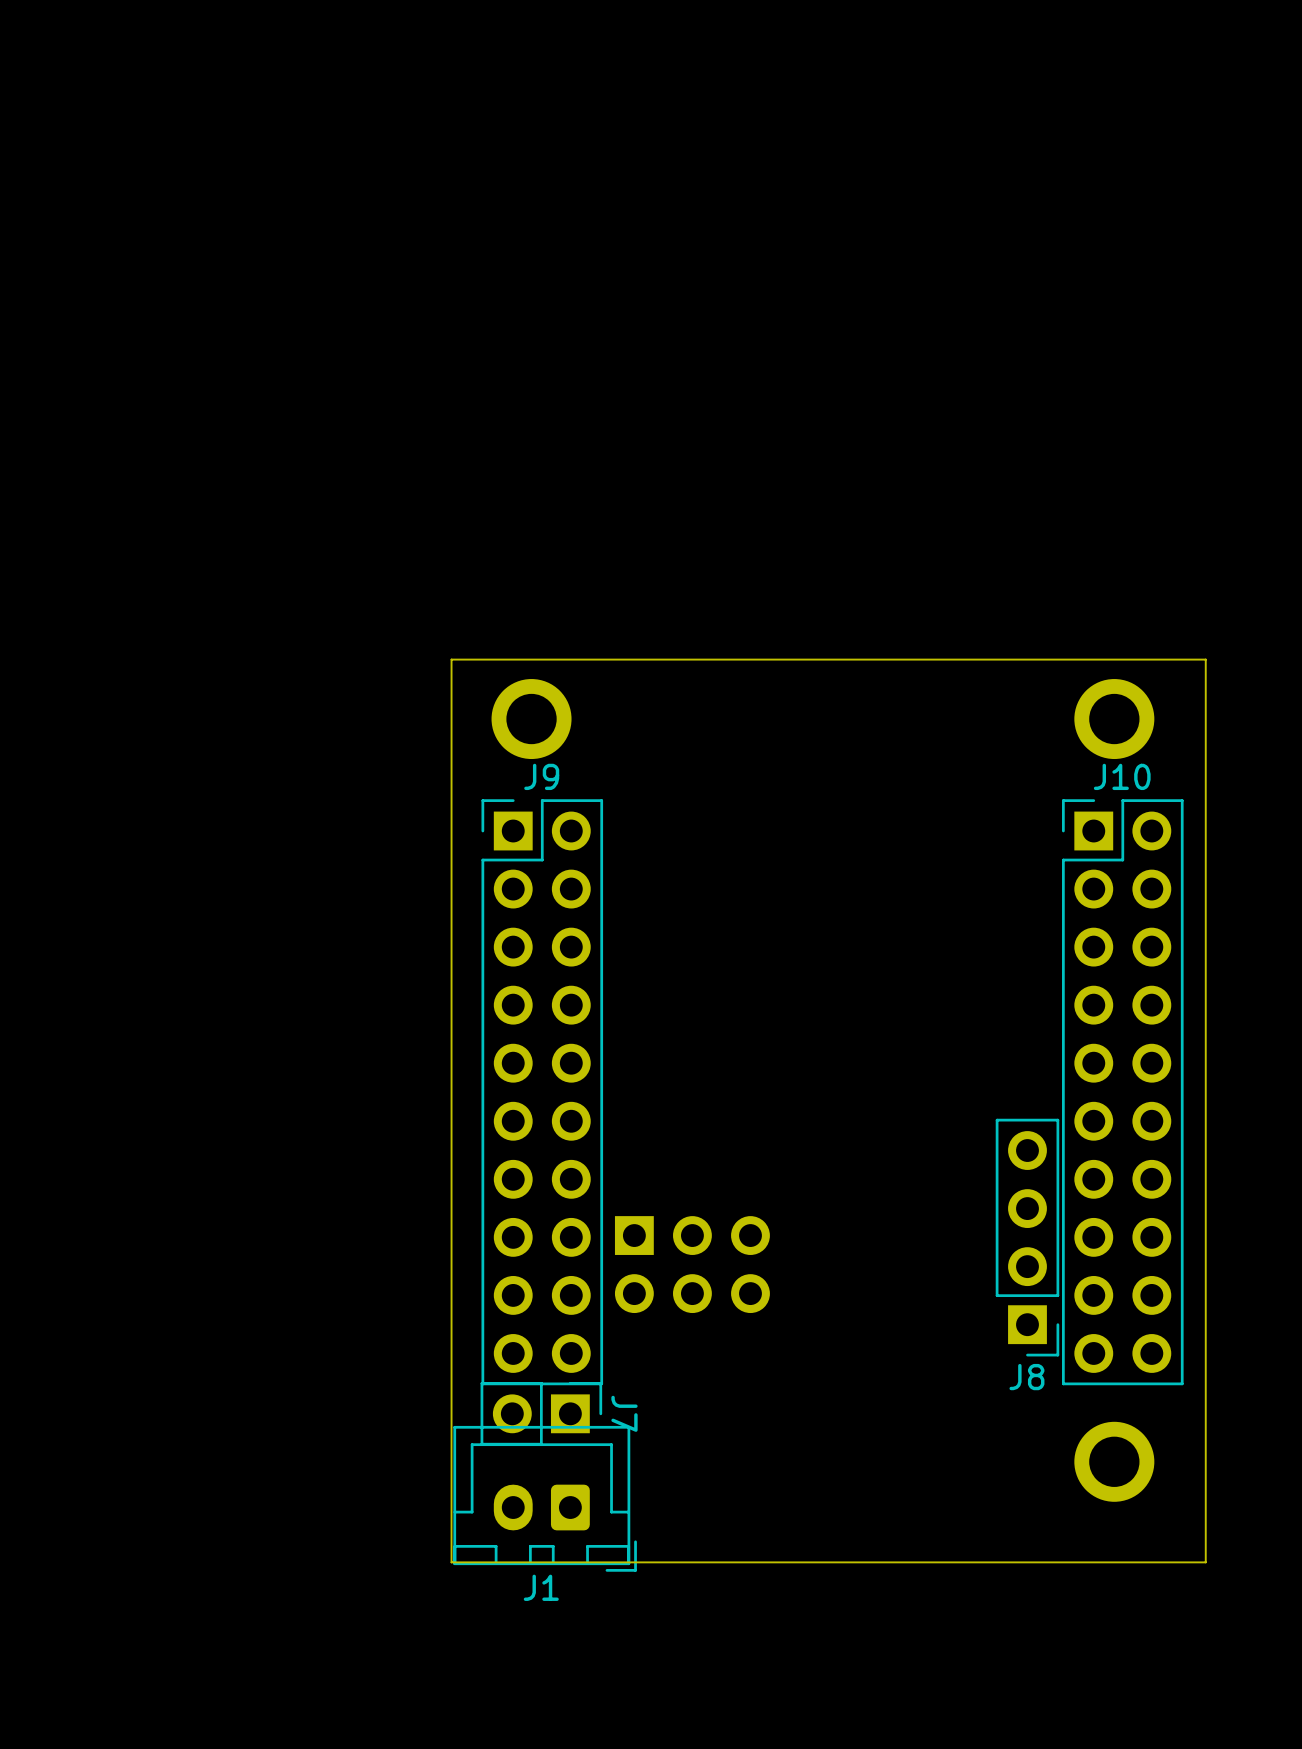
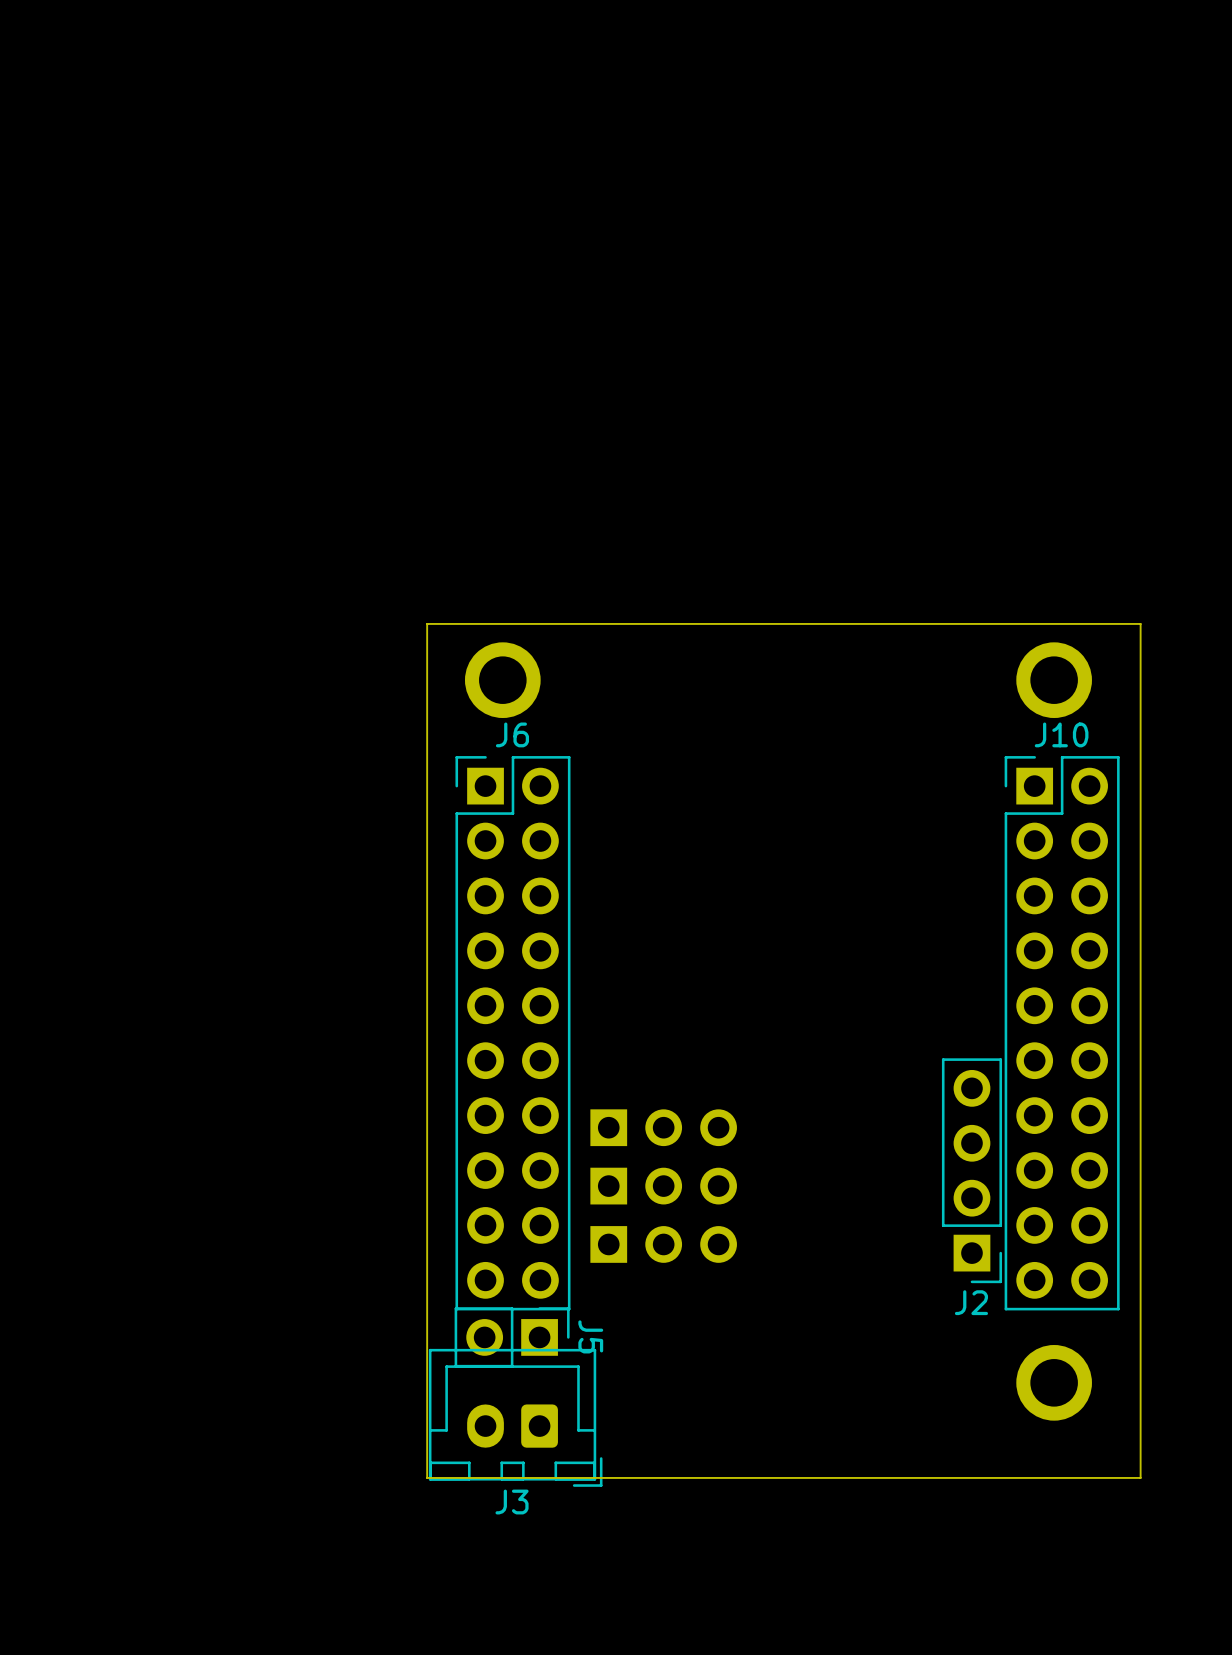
J9 name: J9 (541, 776) -> J6 (512, 734)
part: none -> (663, 1127)
part footprint: [614, 1216, 770, 1314] -> [590, 1167, 737, 1205]
part: none -> (663, 1244)
J8 name: J8 (1026, 1377) -> J2 (971, 1302)
J7 name: J7 (624, 1413) -> J5 (590, 1336)
J1 name: J1 (541, 1587) -> J3 (512, 1502)

